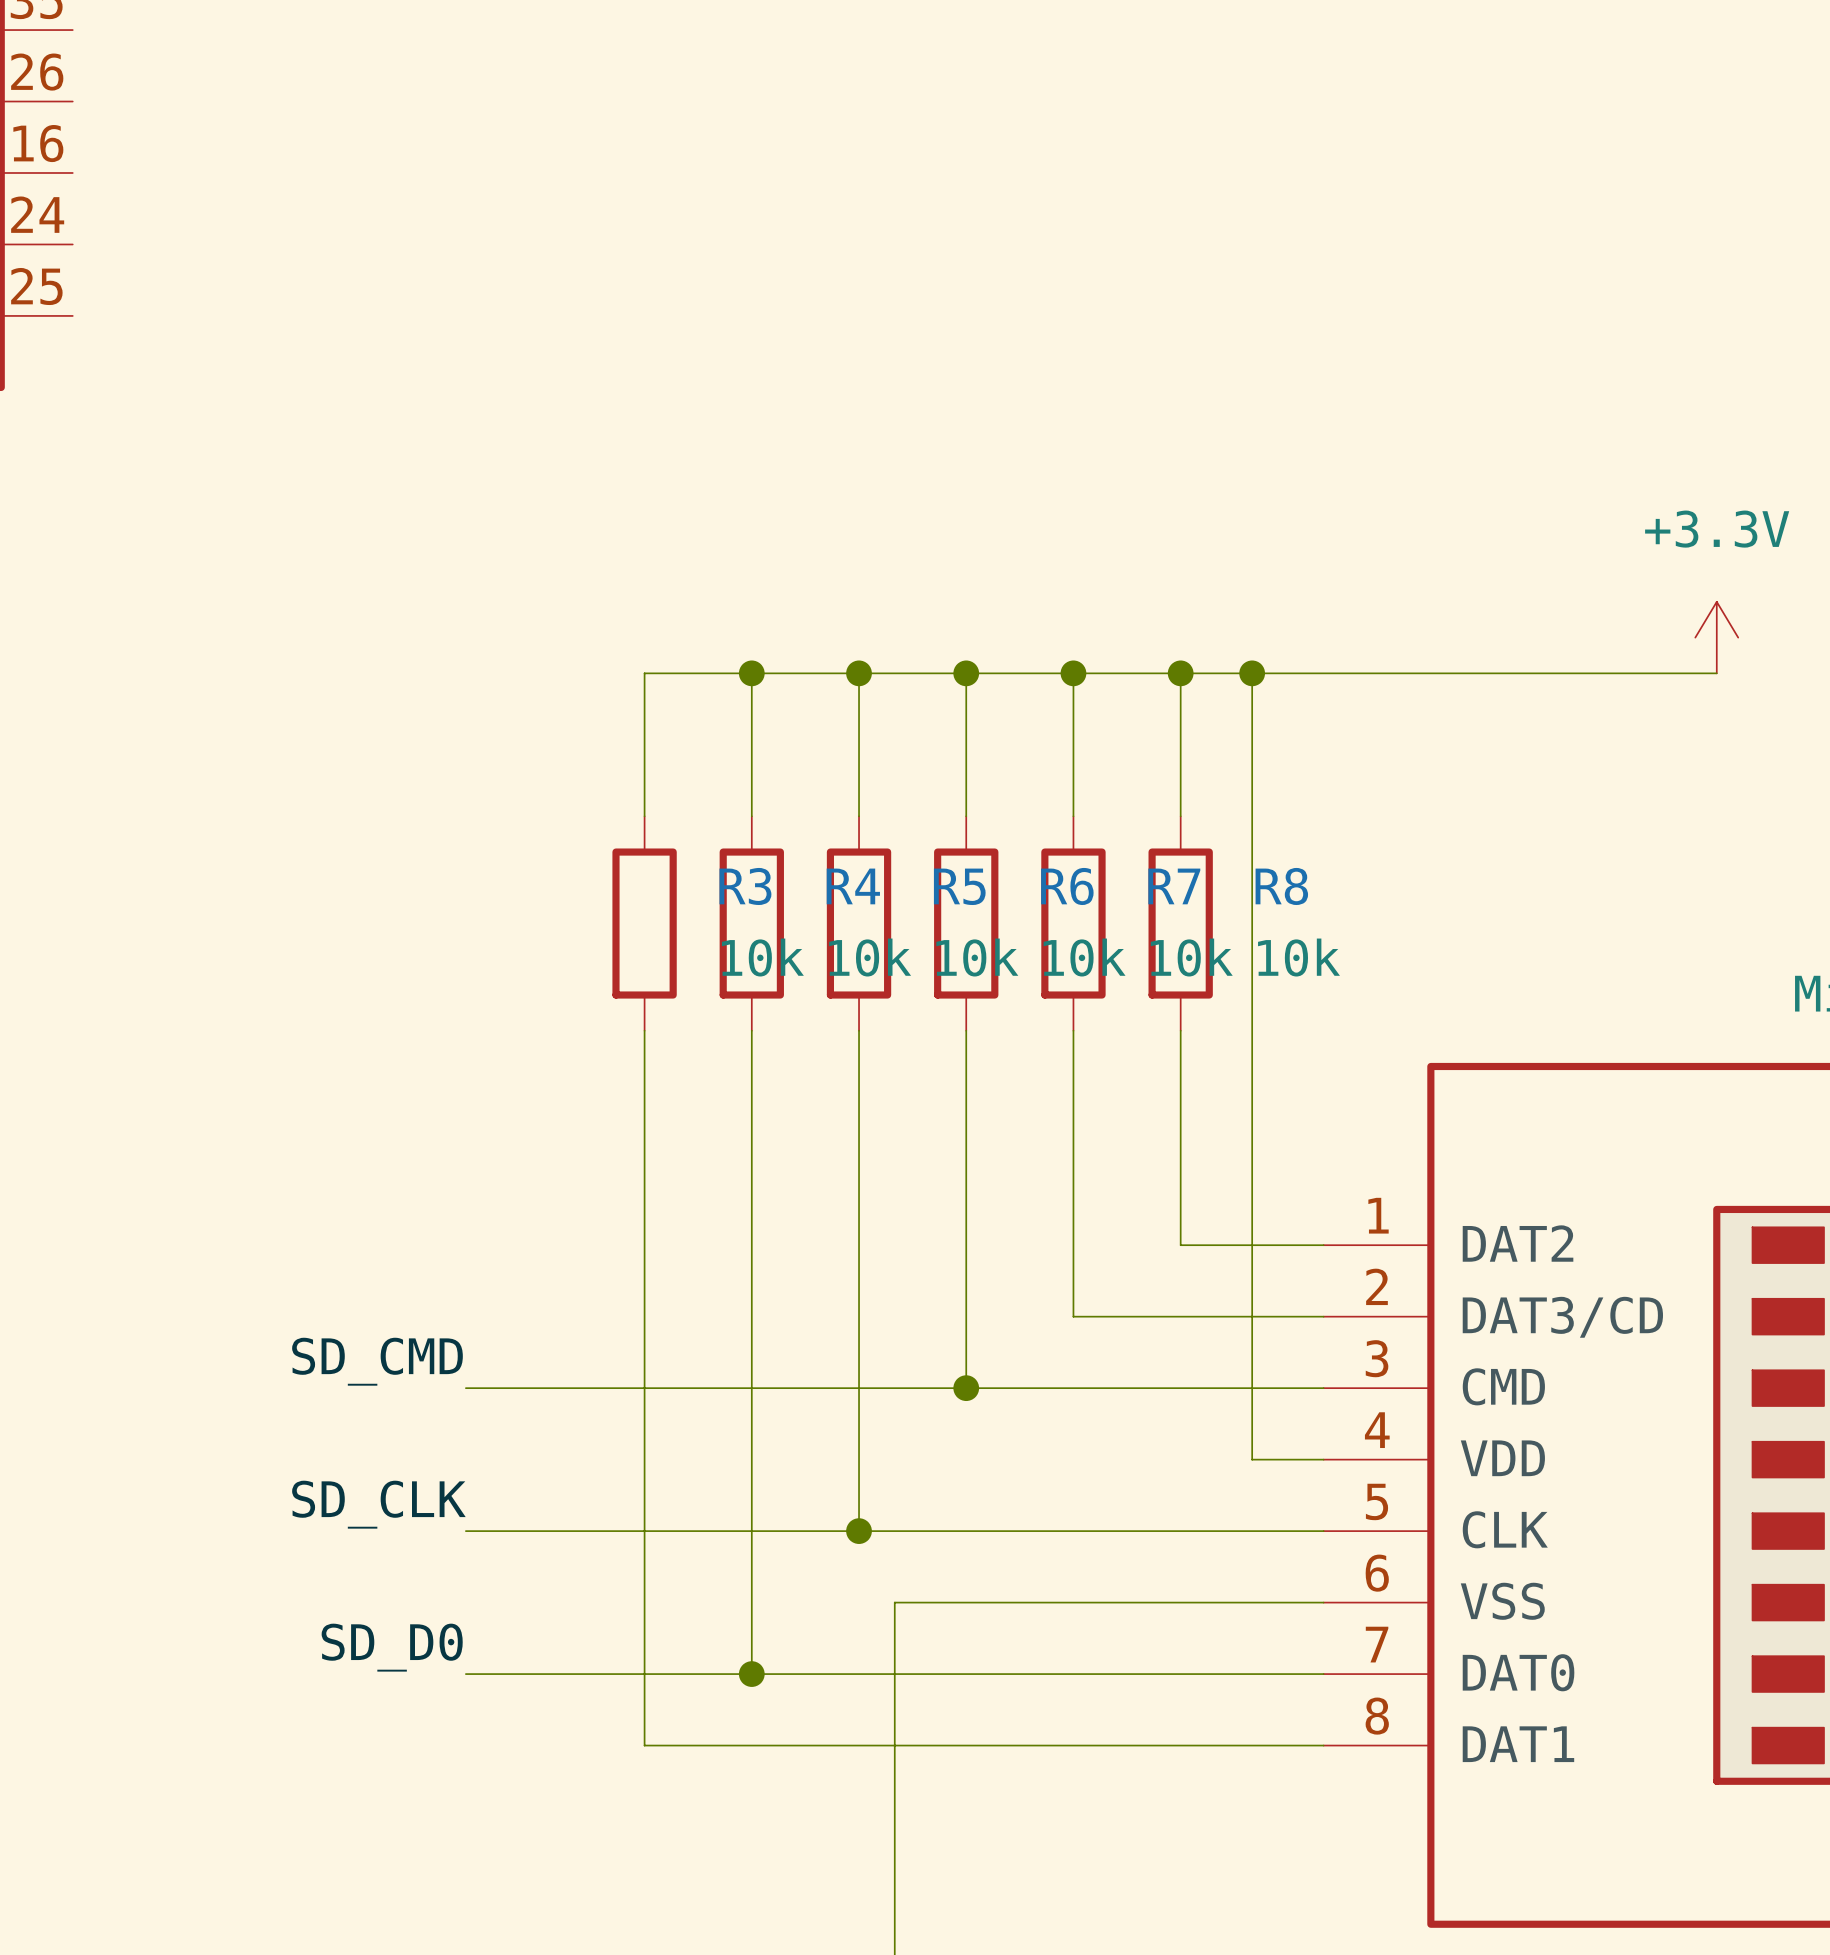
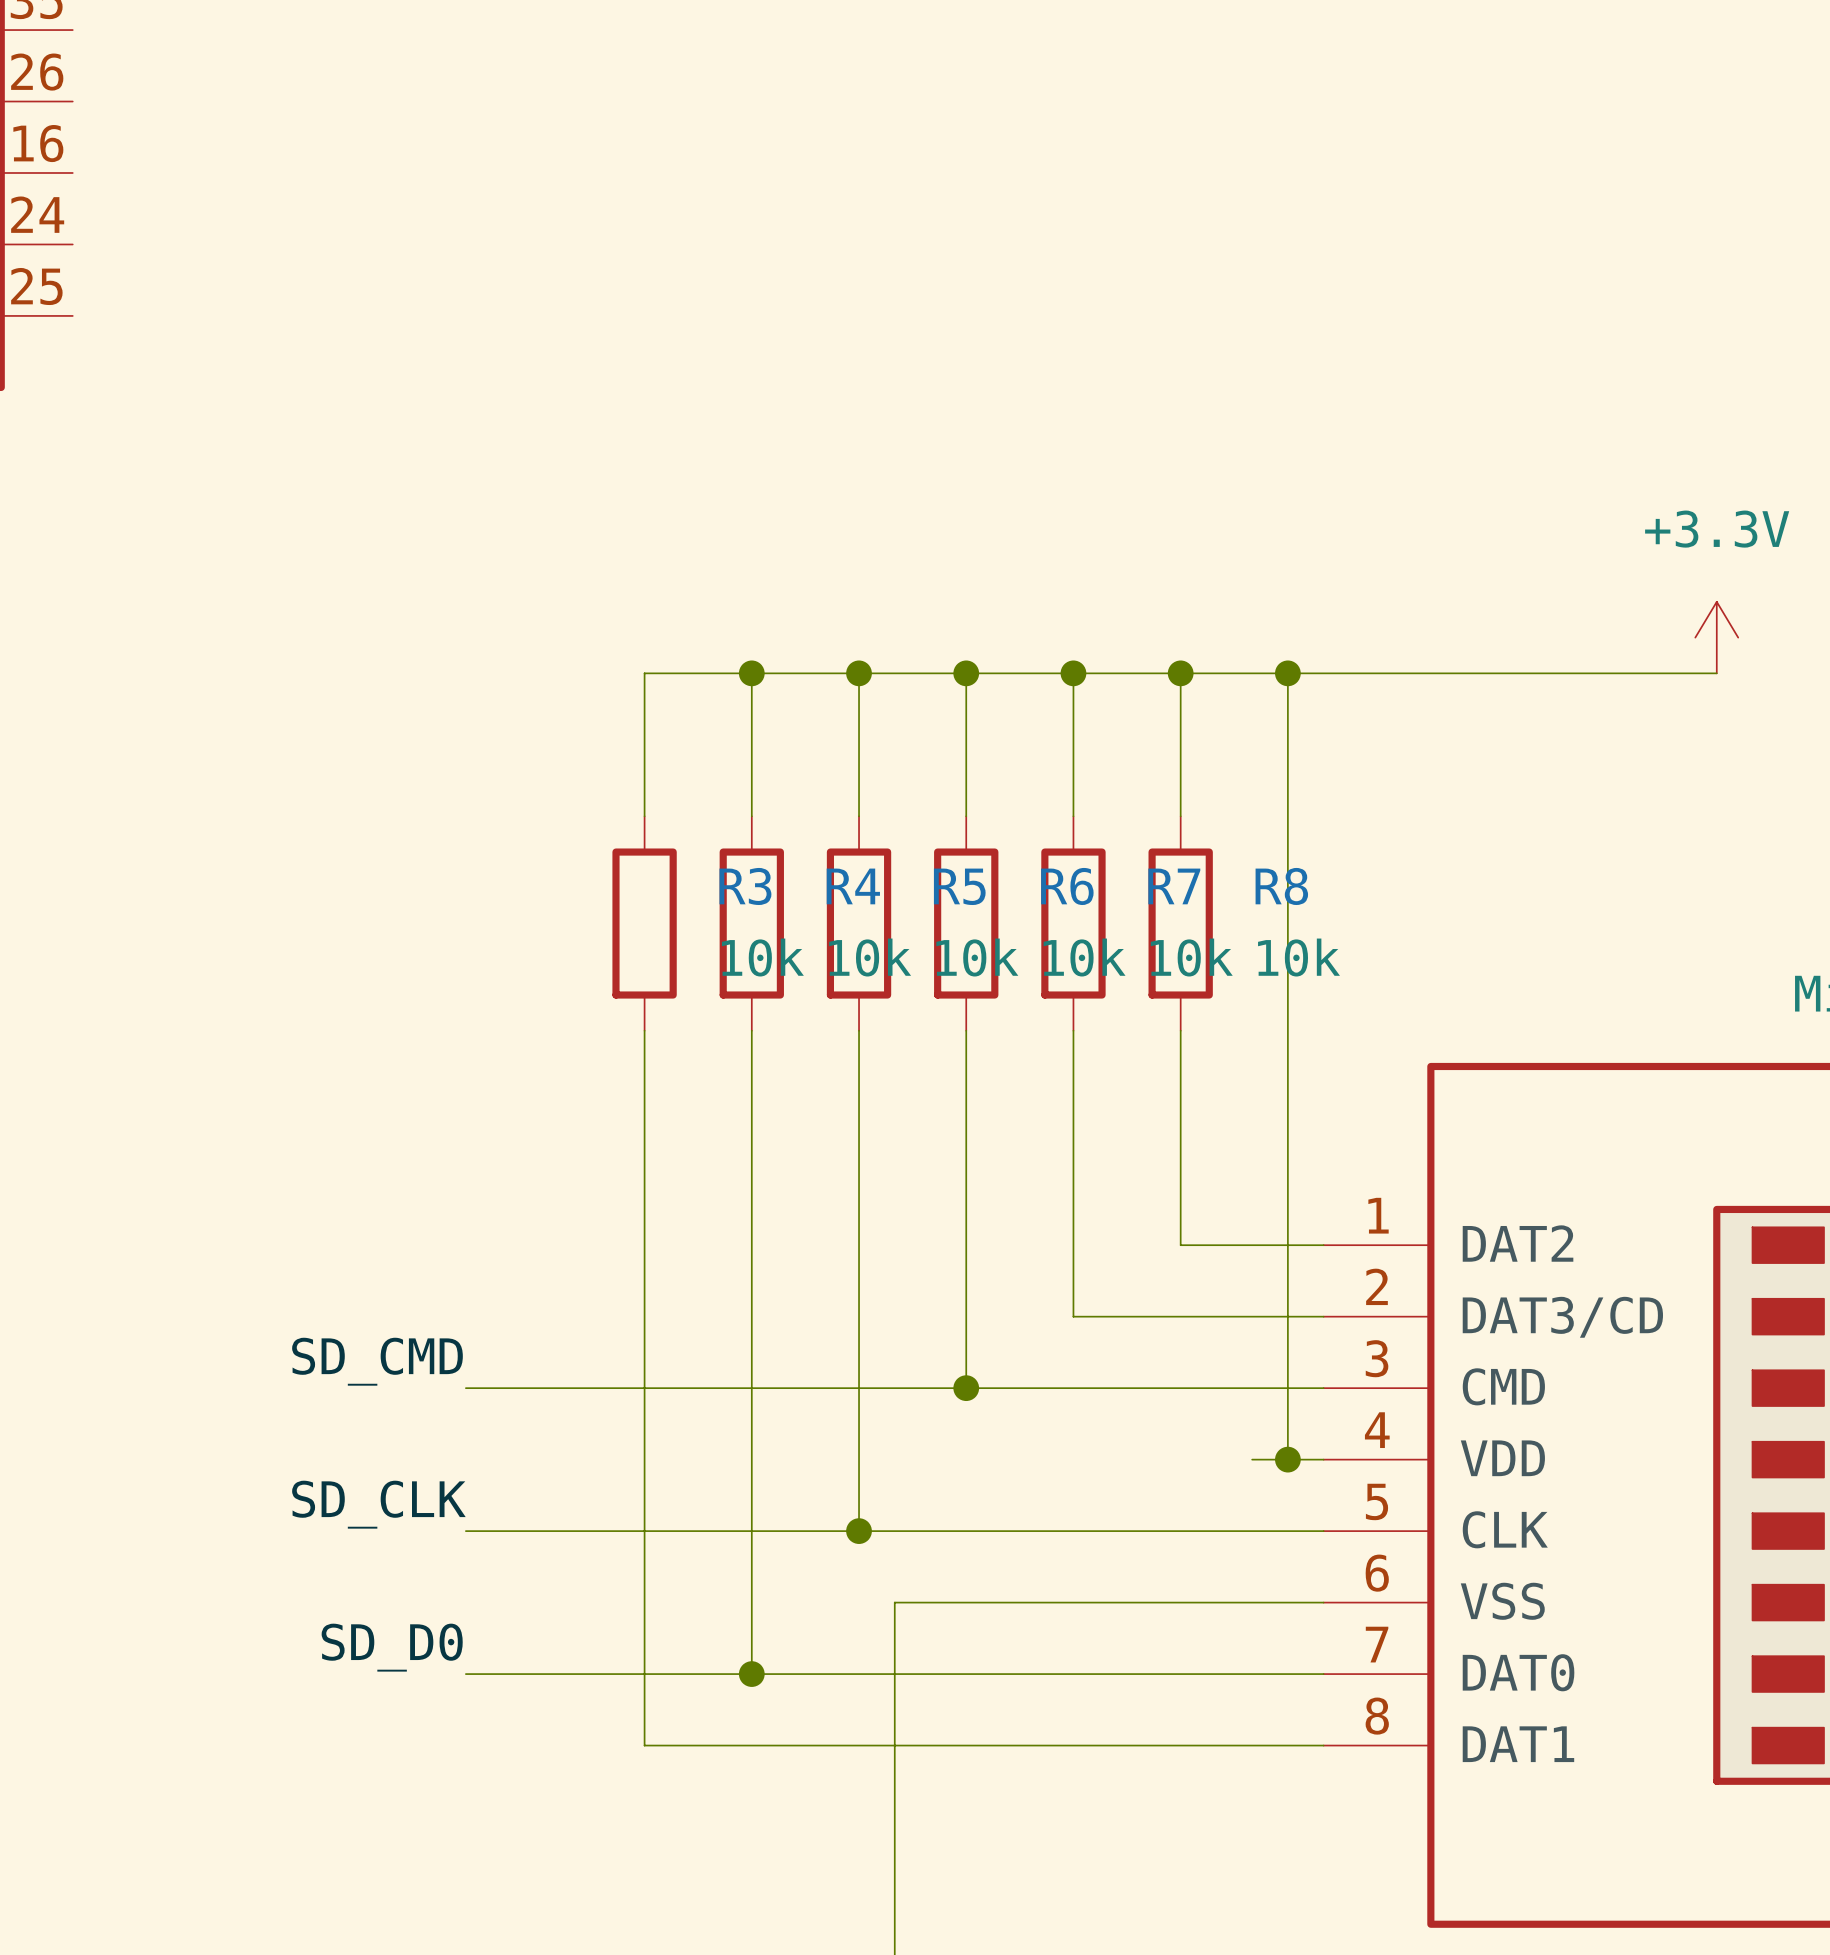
wire: (1252, 673) (1252, 1459) -> (1287, 673) (1287, 1459)
junction position: (1252, 673) -> (1287, 673)
junction: none -> (1287, 1459)

